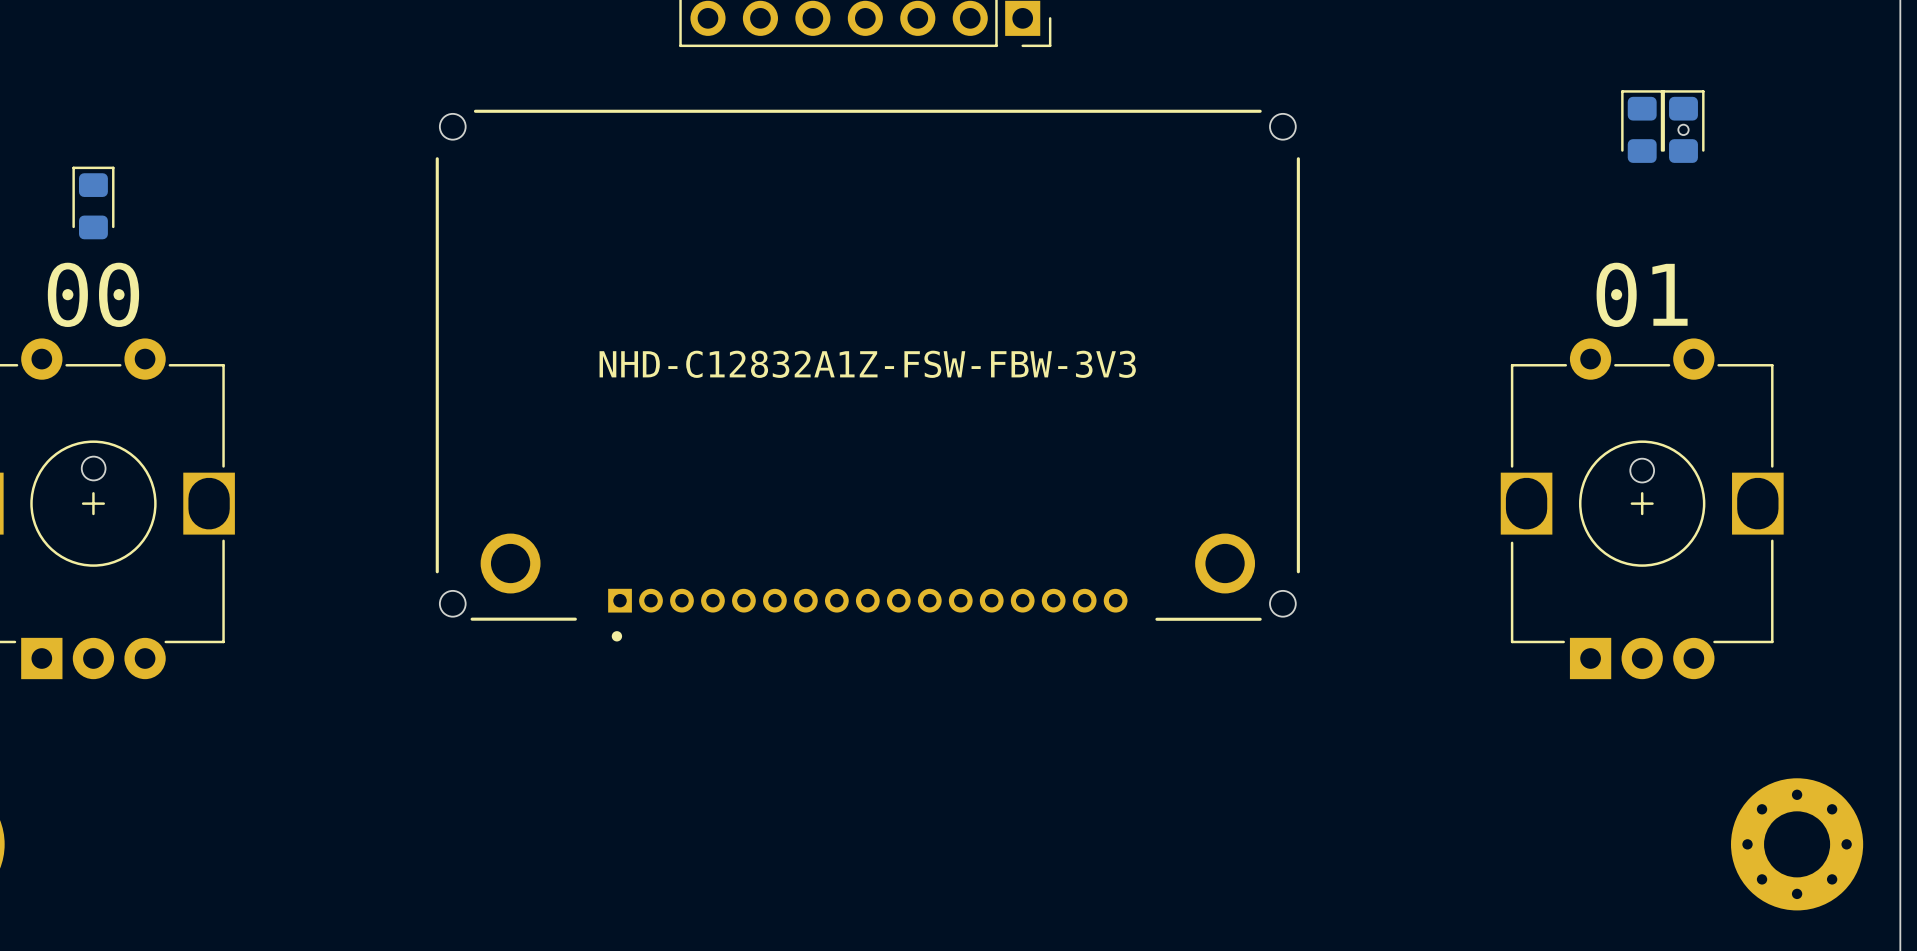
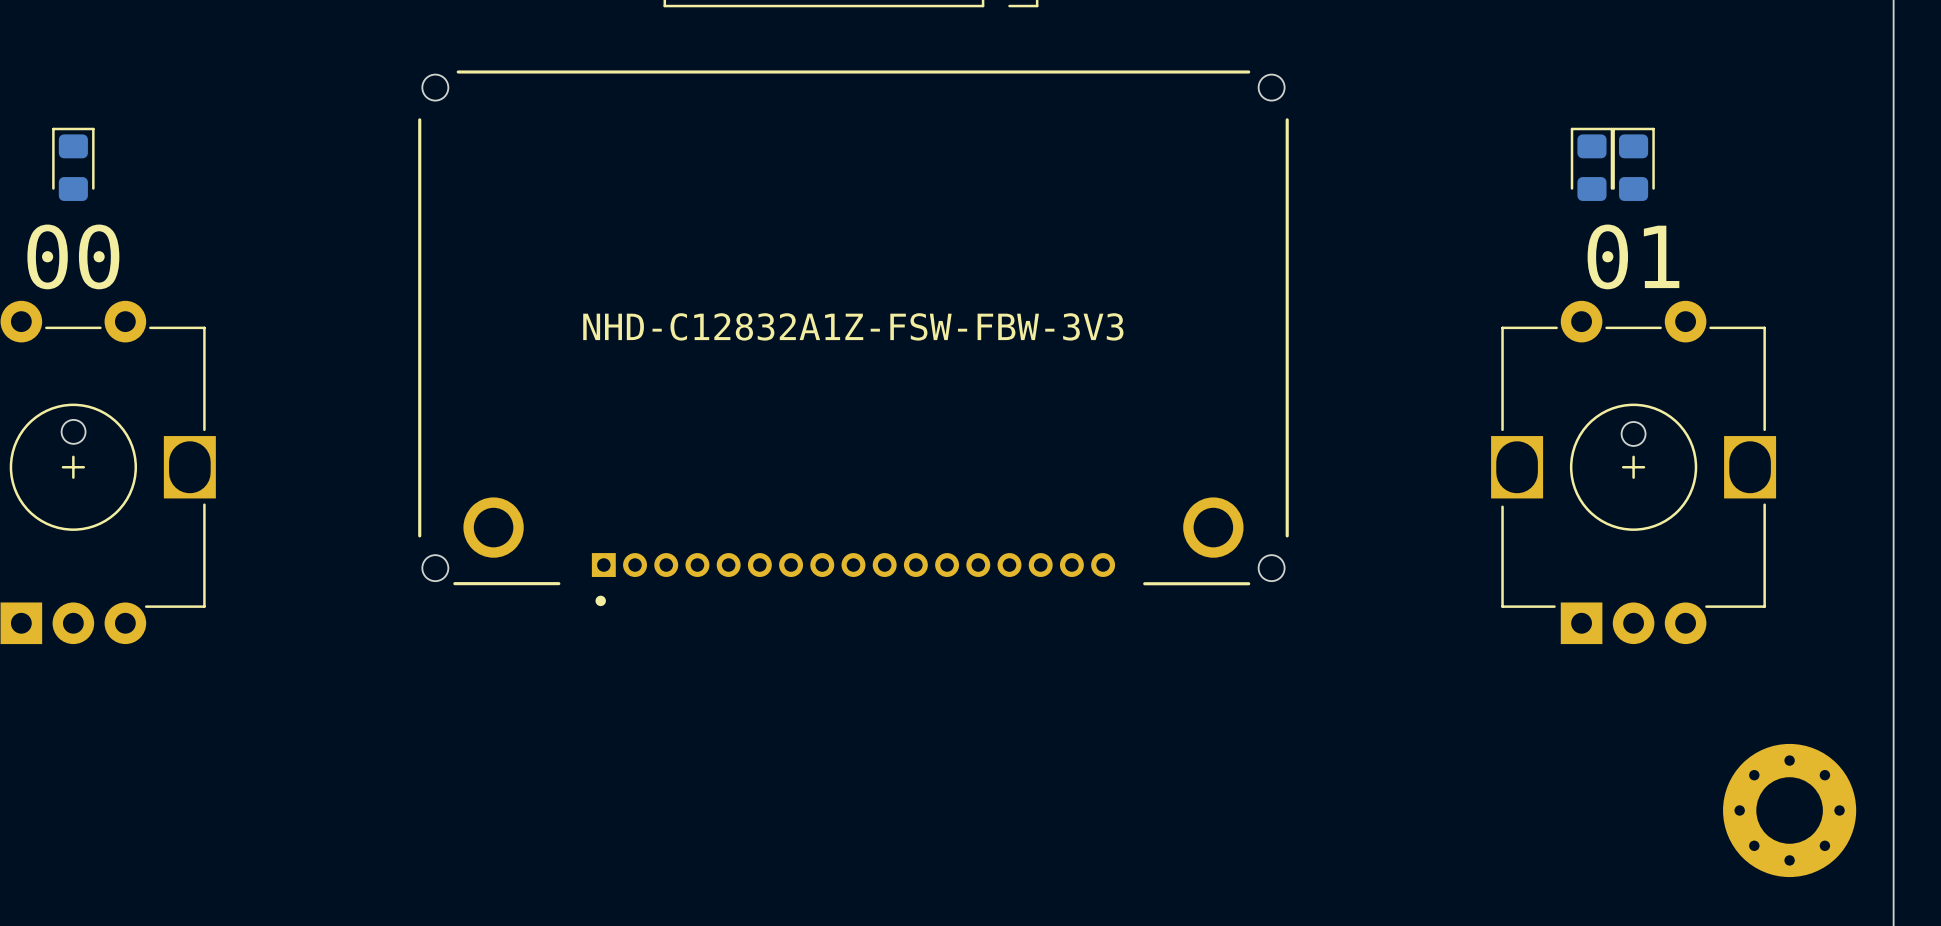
round board edge: [1678, 124, 1689, 136] -> none
part: (1642, 126) -> none
part: (1683, 126) -> none
part: none -> (1591, 164)
part: none -> (1633, 164)

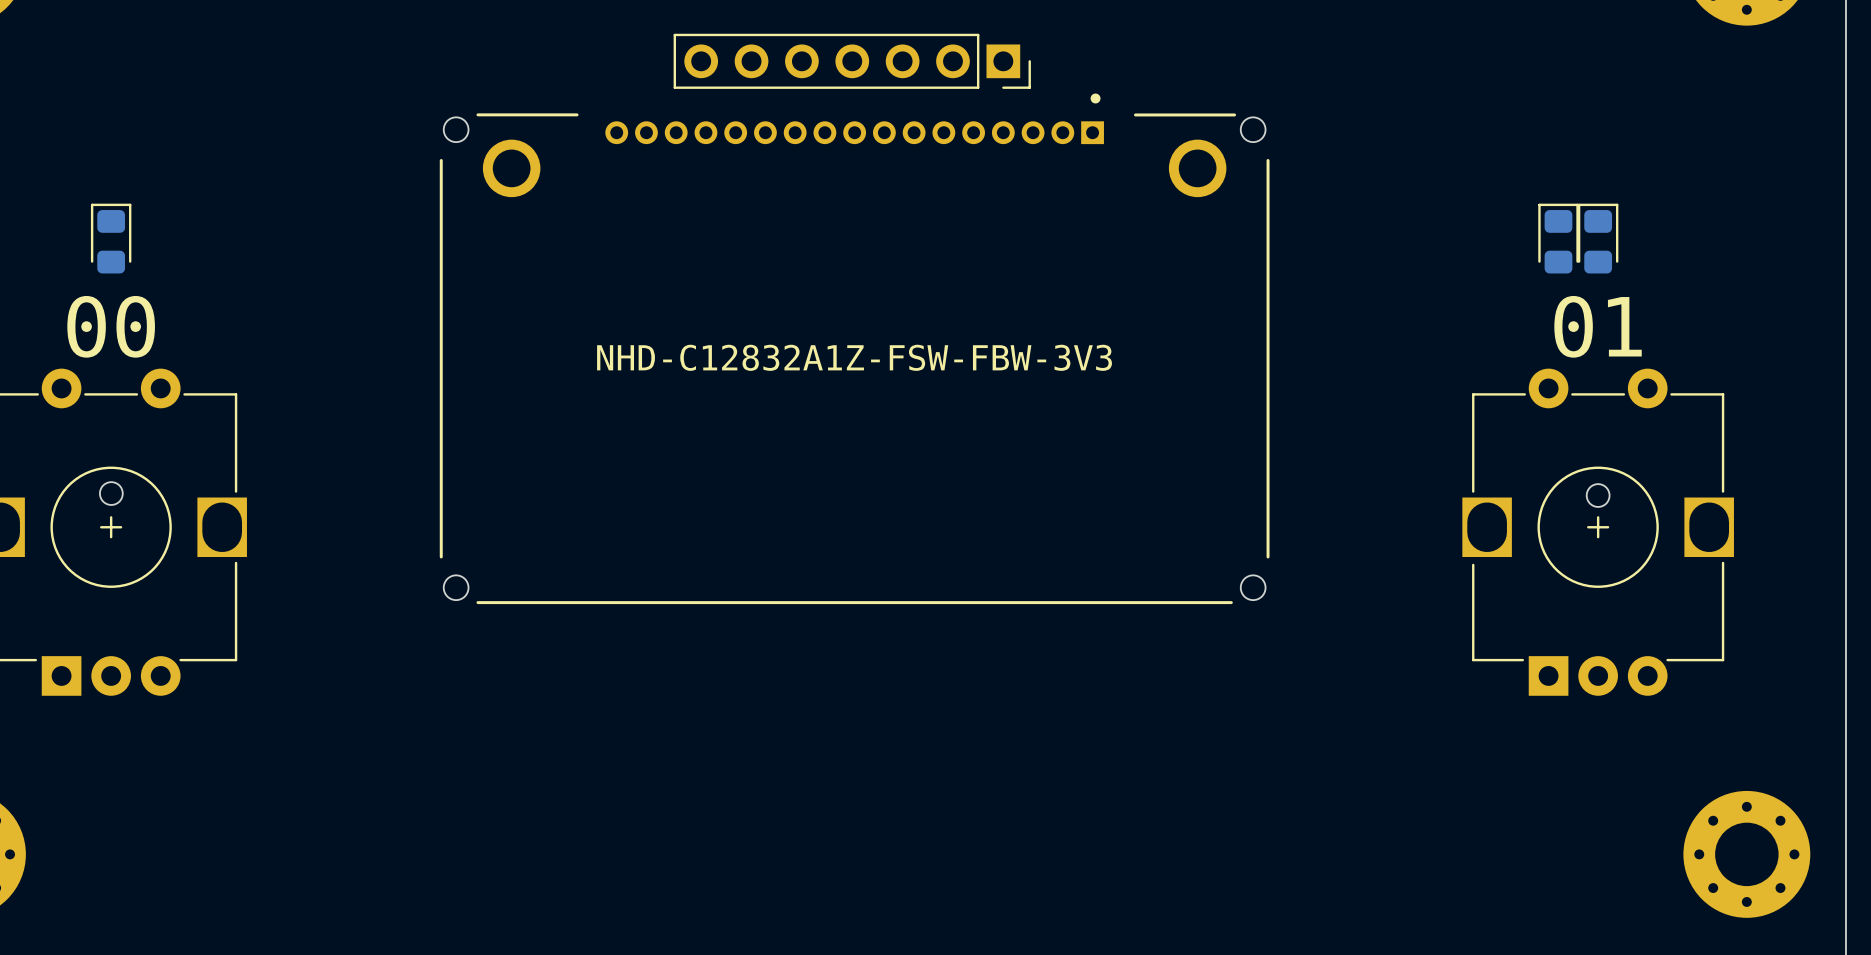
part rotation: 0° (853, 338) -> 180° (854, 348)

